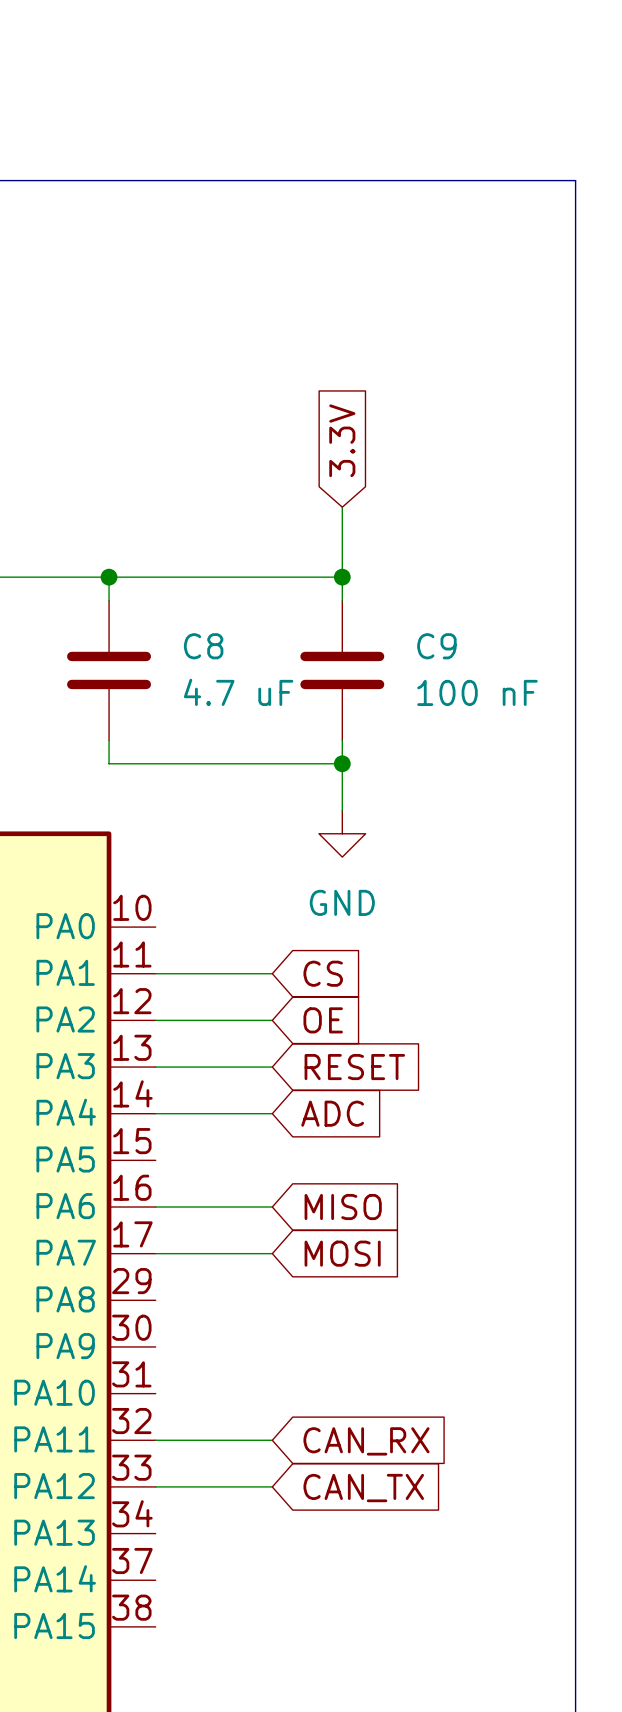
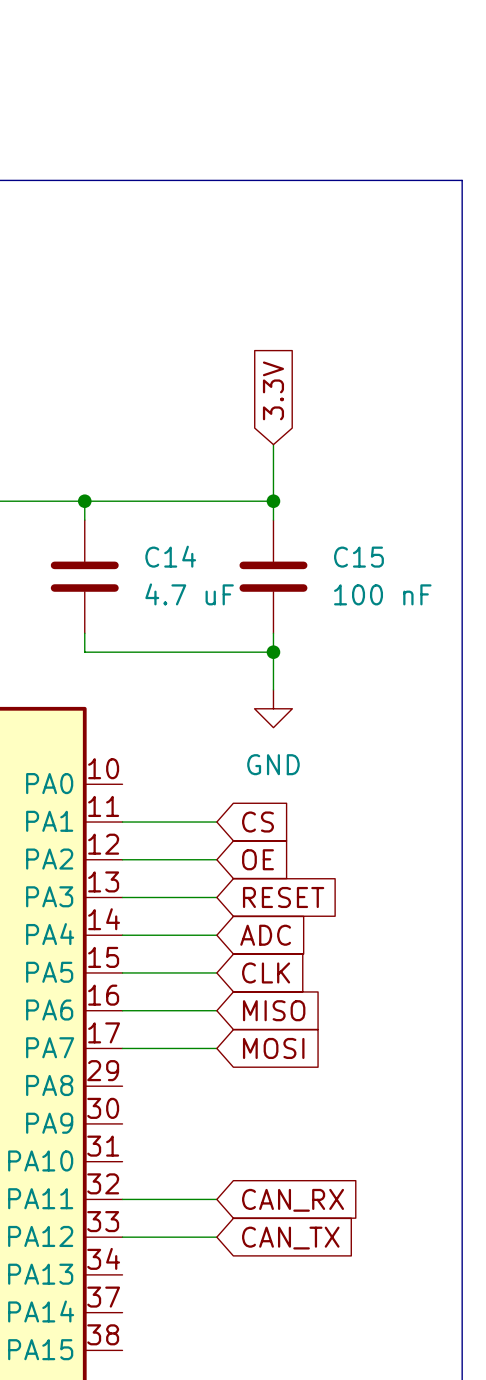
C8 name: C8 (203, 646) -> C14 (170, 556)
C9 name: C9 (436, 646) -> C15 (358, 557)
wire: none -> (122, 972) (216, 972)
global label: none -> CLK (266, 972)

